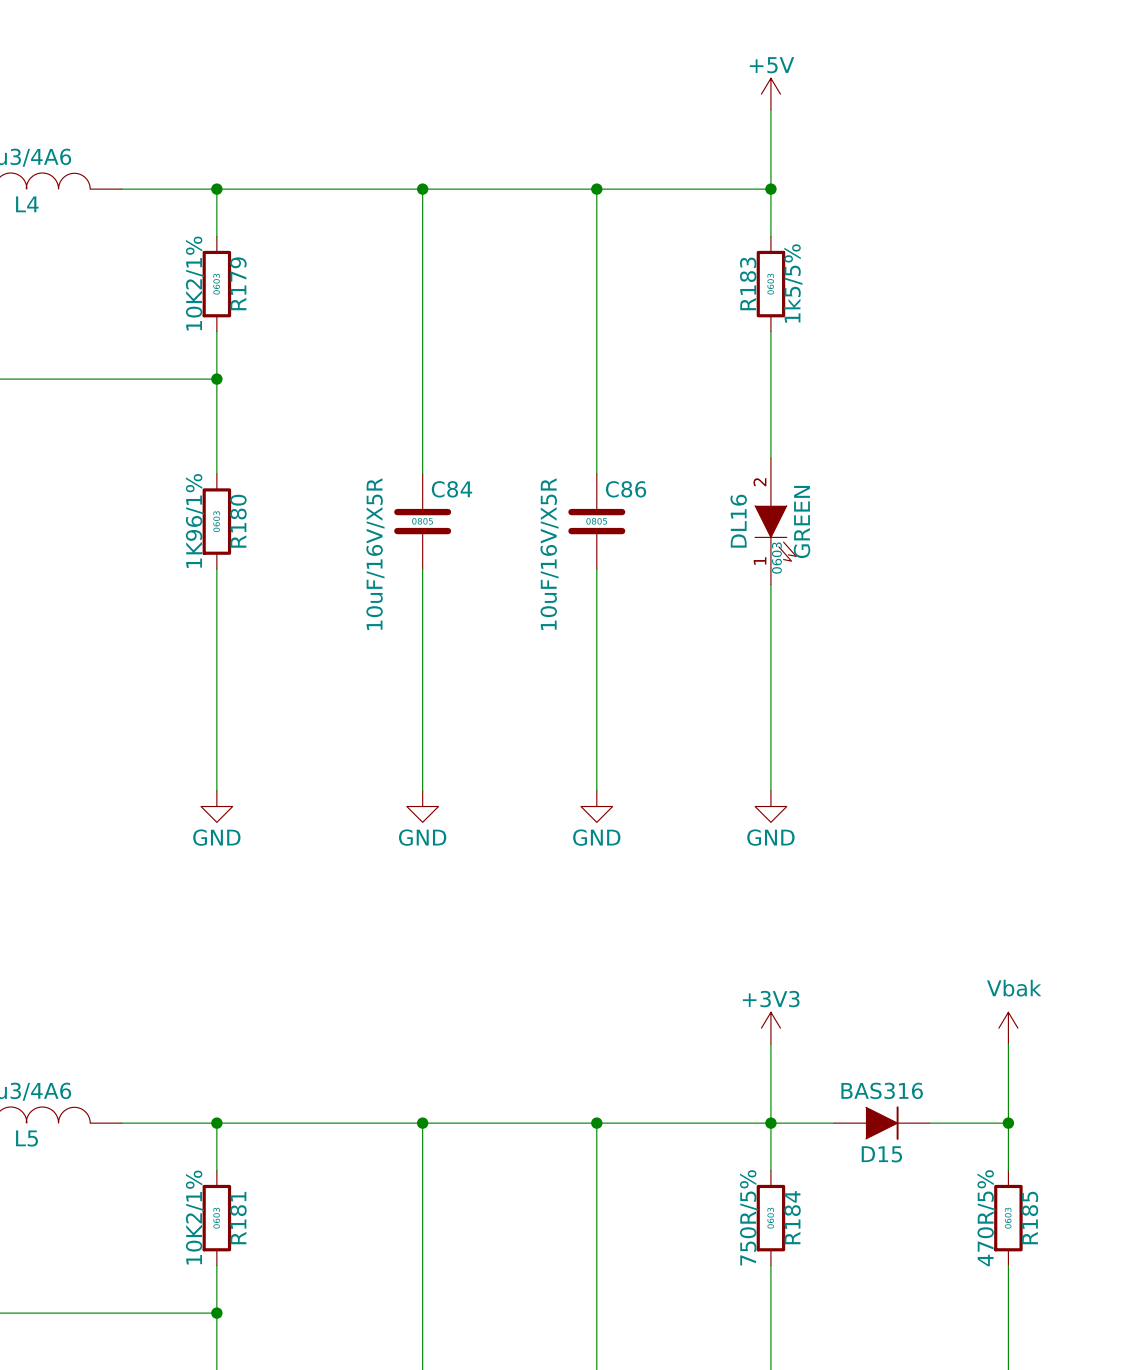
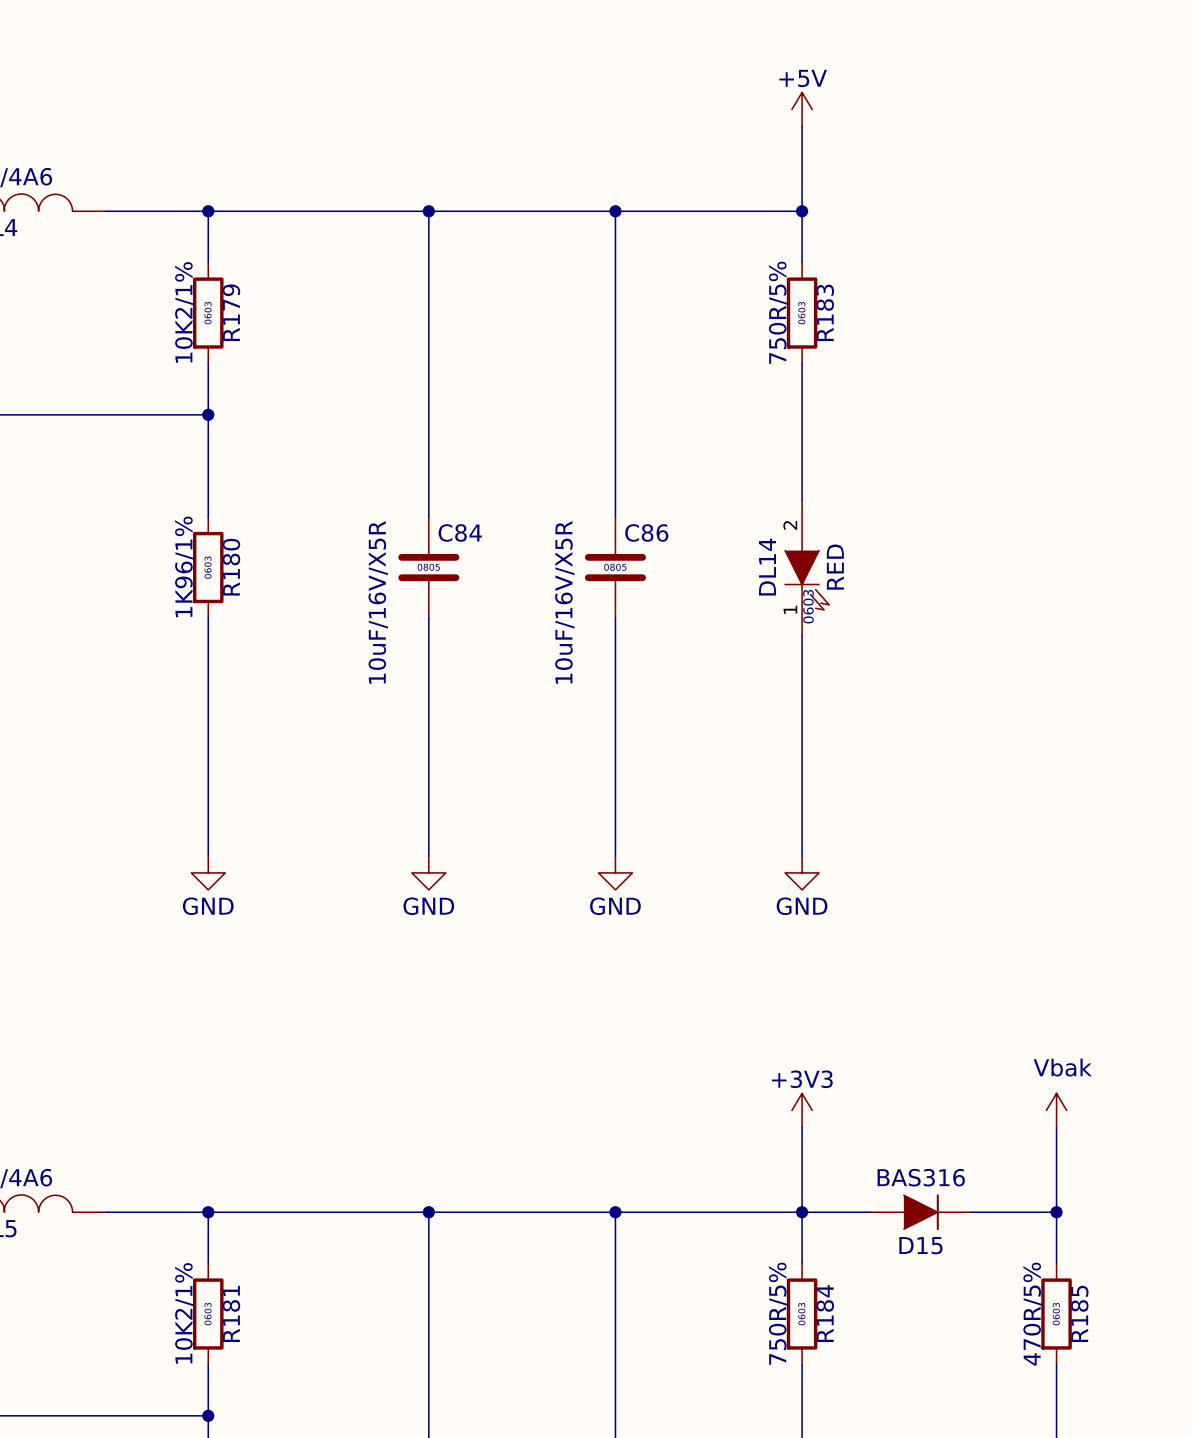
R183 name position: R183 (748, 283) -> R183 (825, 312)
R183 value: 1k5/5% (793, 283) -> 750R/5% (778, 312)
DL16 name: DL16 (738, 521) -> DL14 (767, 567)
DL16 value: GREEN (802, 522) -> RED (835, 567)

